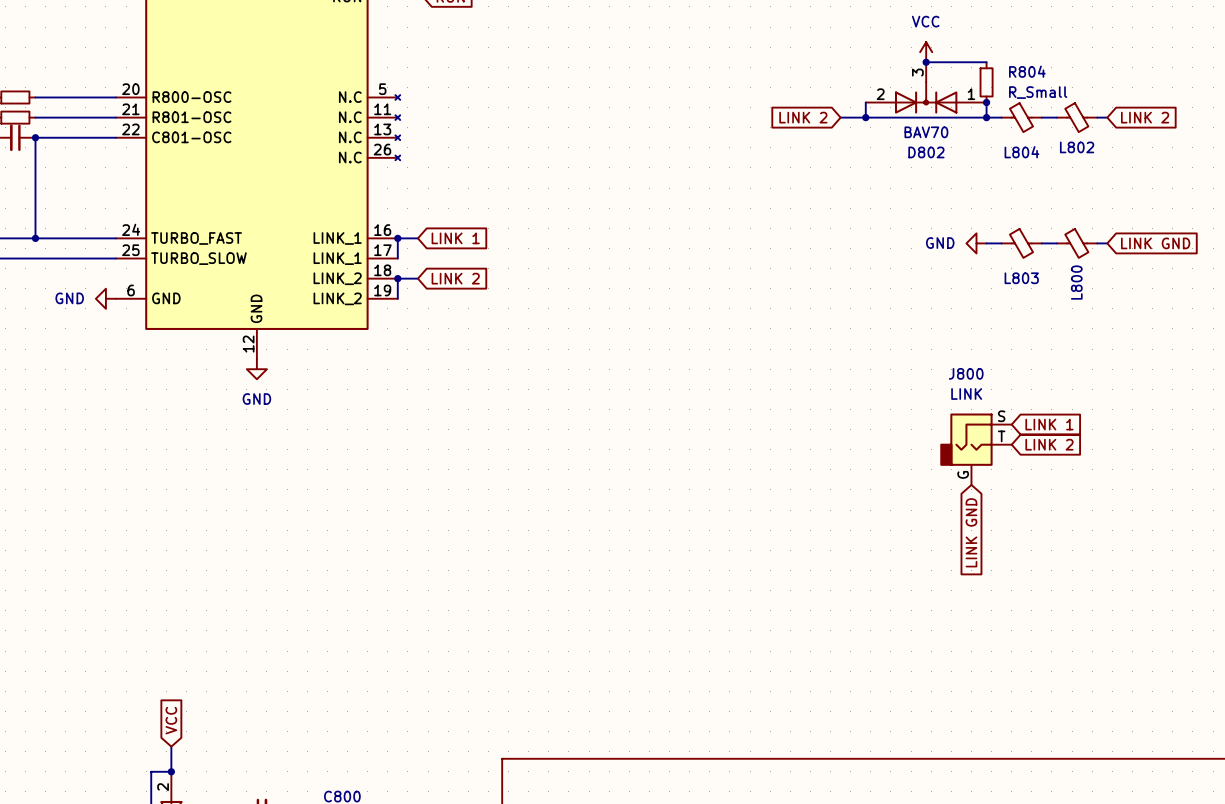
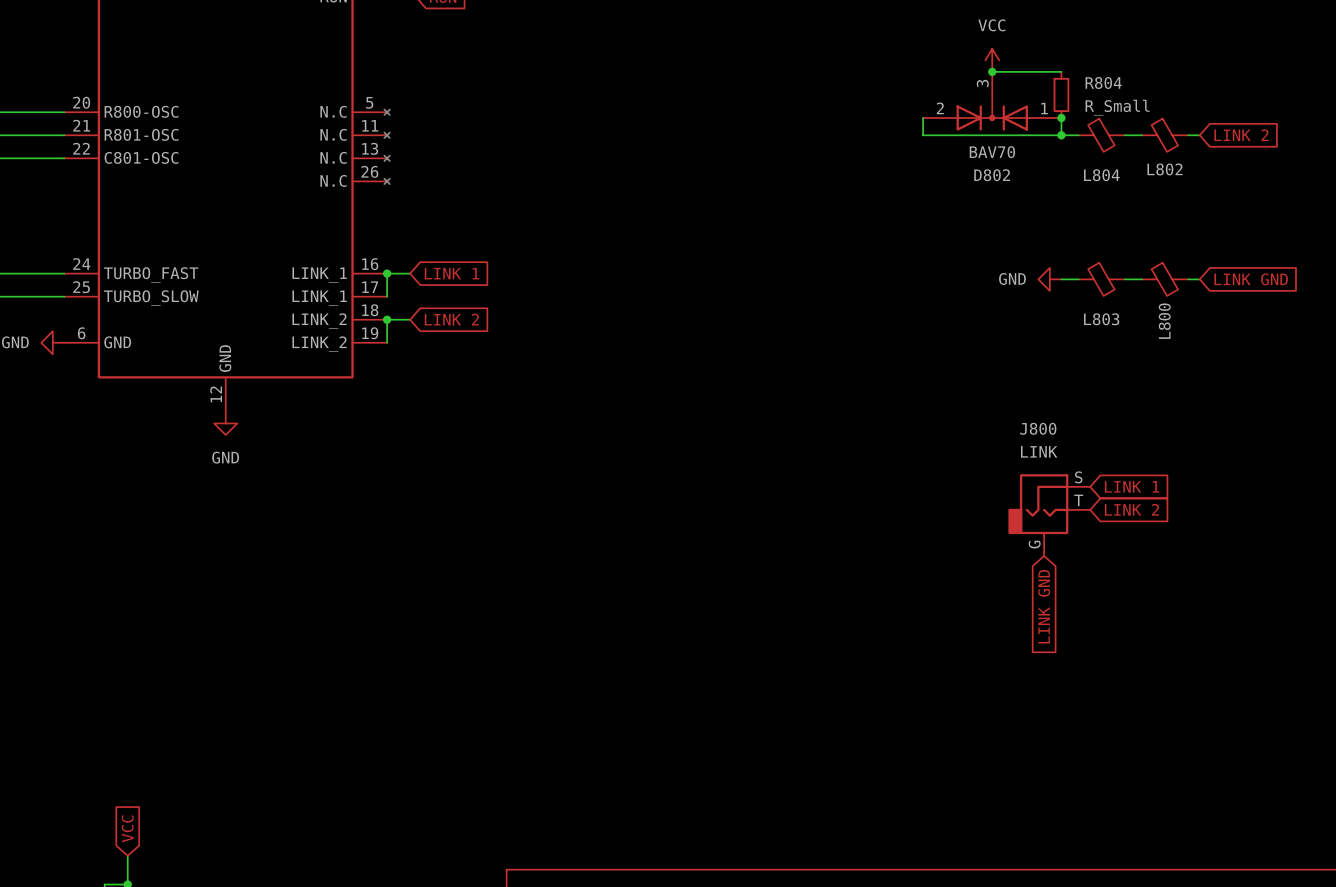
global label: LINK 2 (803, 117) -> none
wire: (840, 117) (865, 117) -> none
junction: (865, 117) -> none

